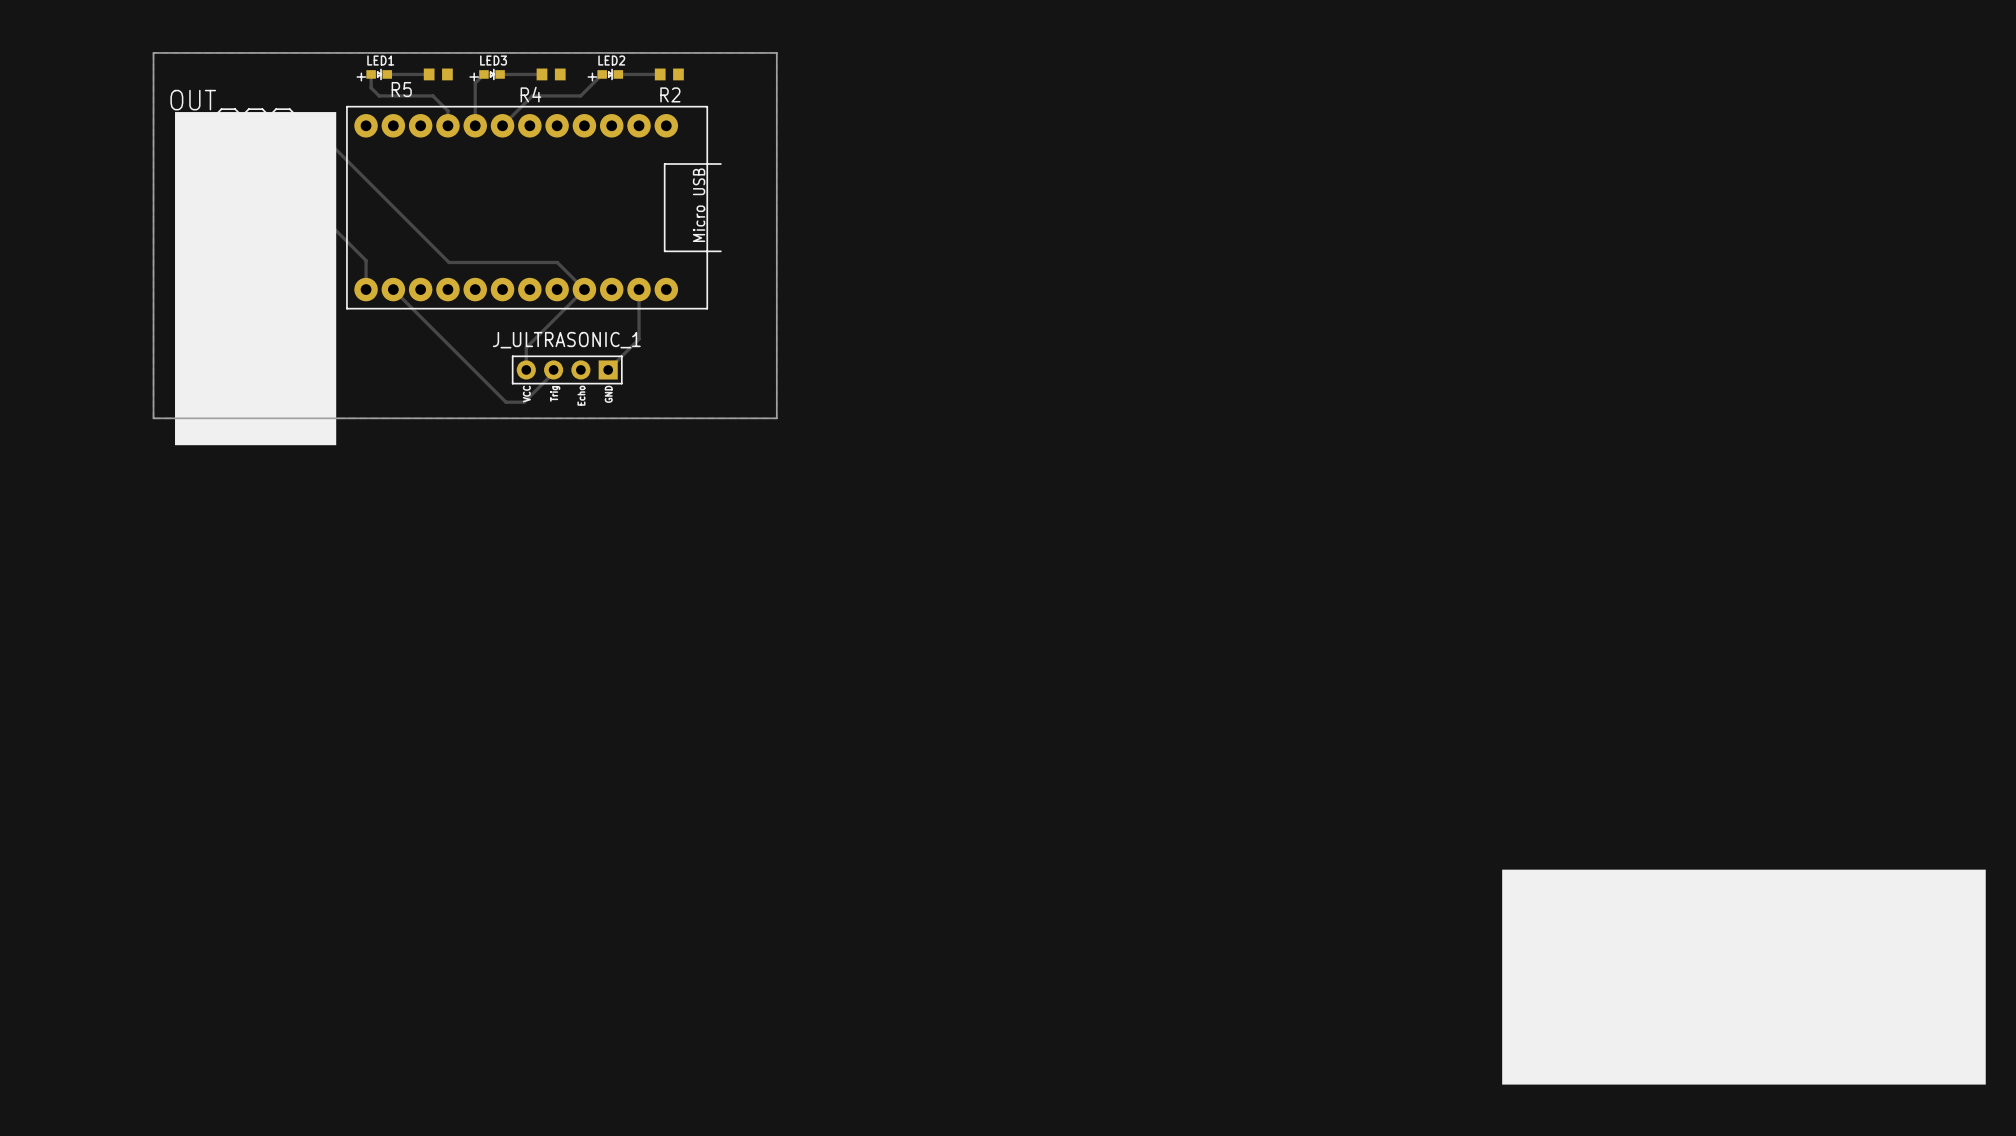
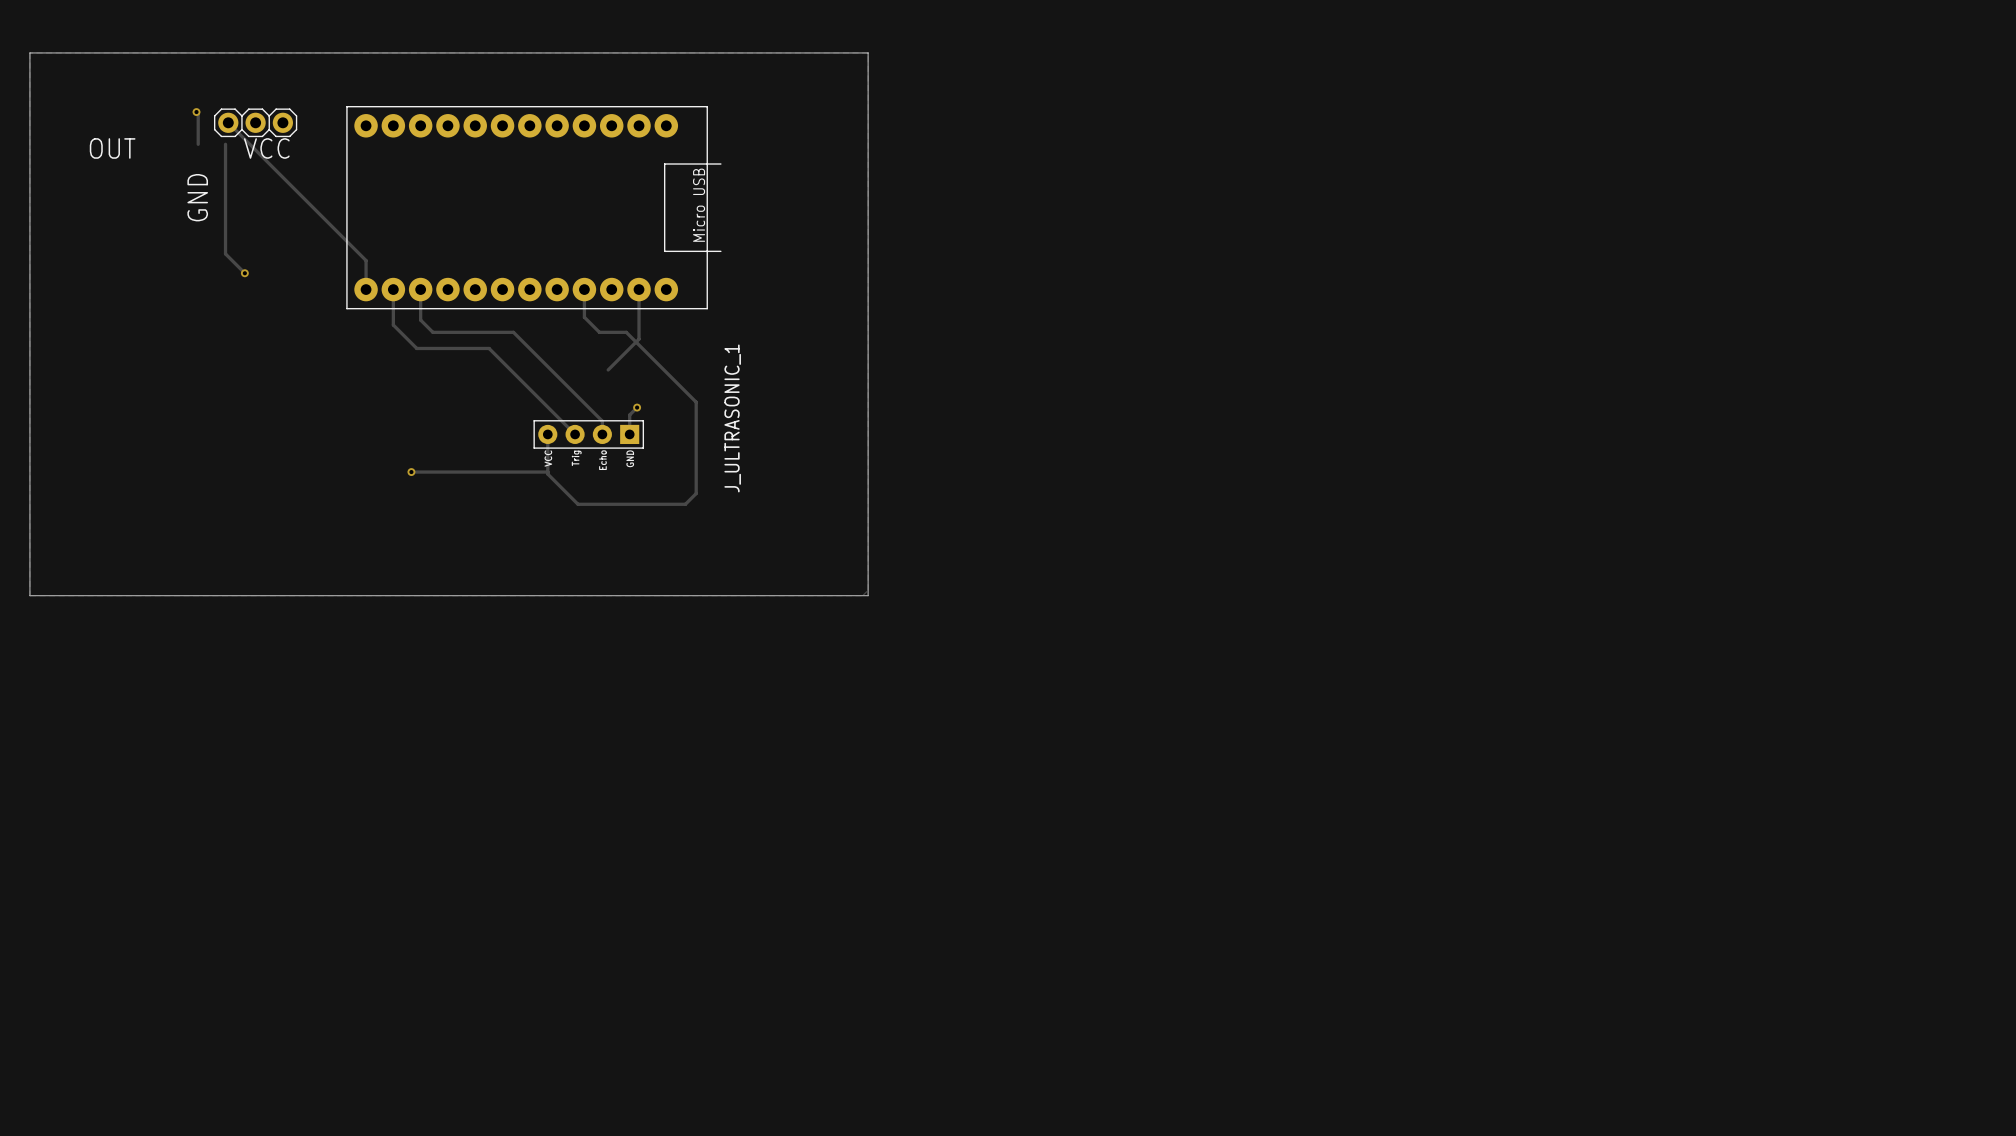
board edge: (153, 52) (153, 418) (776, 418) (776, 52) -> (153, 52) (29, 52) (29, 595) (868, 595) (868, 52) (776, 52)
track: (371, 74) (371, 87) (379, 95) (432, 95) (447, 110) (447, 125) -> none
LED1: (379, 74) -> none
track: (387, 74) (429, 74) -> none
R5: (438, 74) -> none
track: (483, 74) (475, 83) (475, 125) -> none
LED3: (492, 74) -> none
track: (500, 74) (541, 74) -> none
R4: (551, 74) -> none
track: (602, 74) (580, 95) (532, 95) (502, 125) -> none
LED2: (610, 74) -> none
track: (618, 74) (660, 74) -> none
R2: (669, 74) -> none
text position: OUT (193, 100) -> OUT (112, 148)
drawing: [175, 112, 337, 446] -> none
track: none -> (196, 112) (198, 113) (198, 144)
via: none -> (196, 112)
track: (282, 122) (309, 122) (449, 262) (557, 262) (584, 289) (526, 347) (526, 369) -> none
track: none -> (225, 144) (225, 253) (244, 273)
via: none -> (244, 273)
track: (393, 289) (505, 402) (524, 402) (553, 372) (553, 369) -> (393, 289) (393, 325) (416, 348) (489, 348) (575, 434)
track: none -> (420, 289) (420, 320) (432, 332) (513, 332) (602, 421) (602, 434)
track: none -> (584, 289) (584, 317) (599, 332) (626, 332) (696, 402) (696, 493) (685, 504) (577, 504) (547, 474) (547, 434)
J_ULTRASONIC_1 name rotation: 0° (566, 340) -> 90° counterclockwise (732, 418)
J_ULTRASONIC_1 position: (567, 369) -> (588, 434)
track: none -> (637, 407) (629, 414) (629, 434)
via: none -> (637, 407)
track: none -> (411, 472) (547, 472)
via: none -> (411, 472)
drawing: [1502, 869, 1986, 1085] -> none

